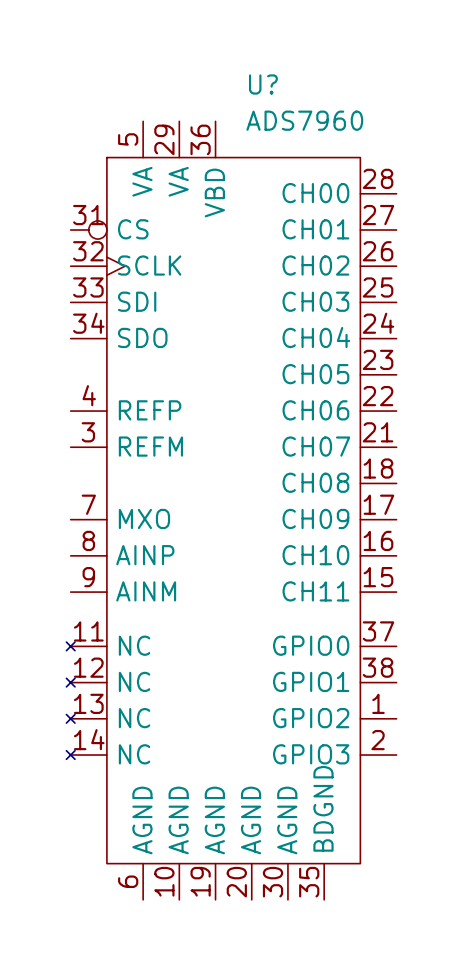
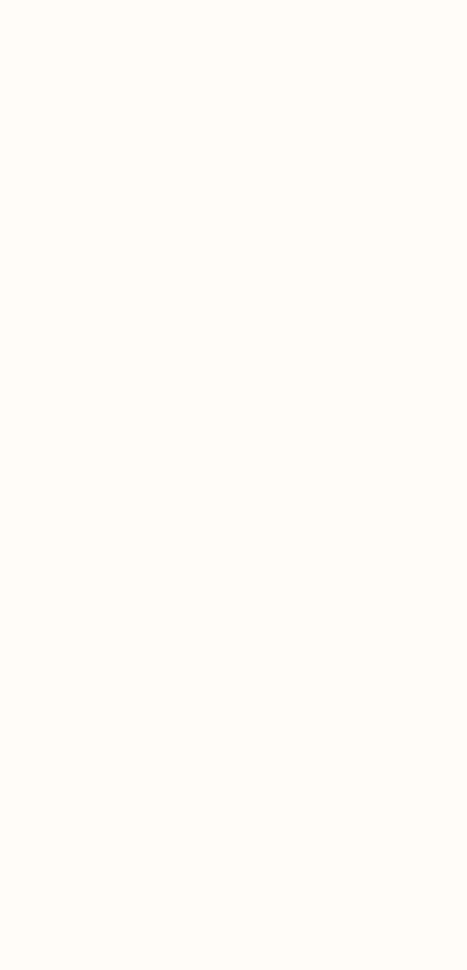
U?: ADS7960 (231, 510) -> none

